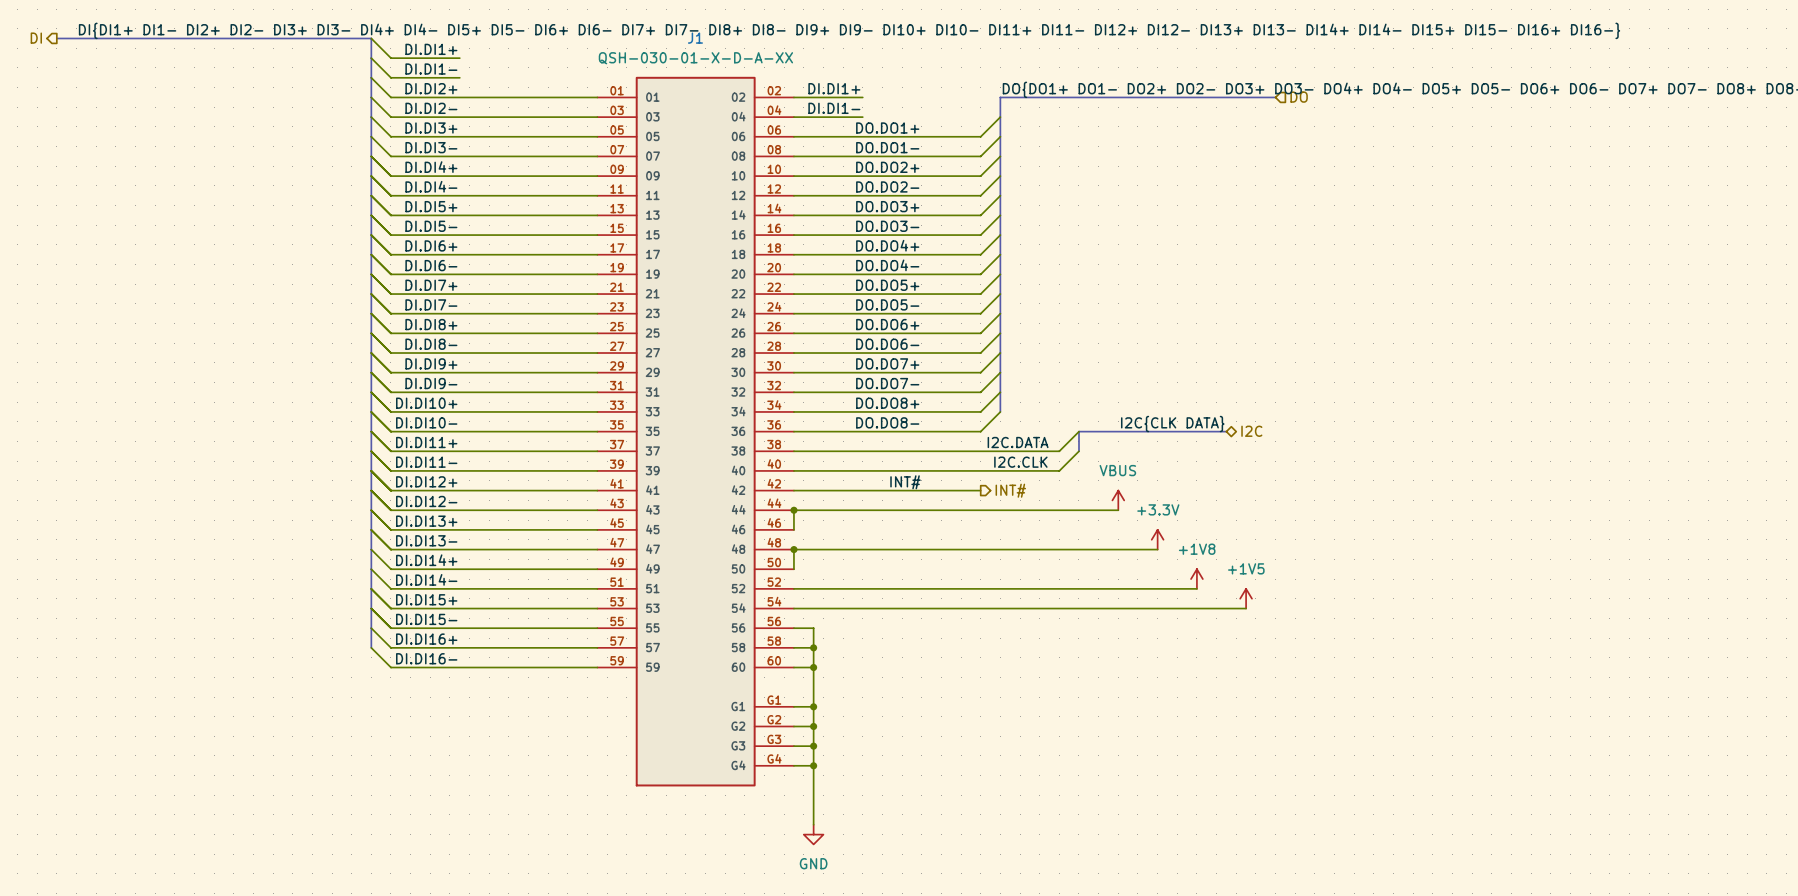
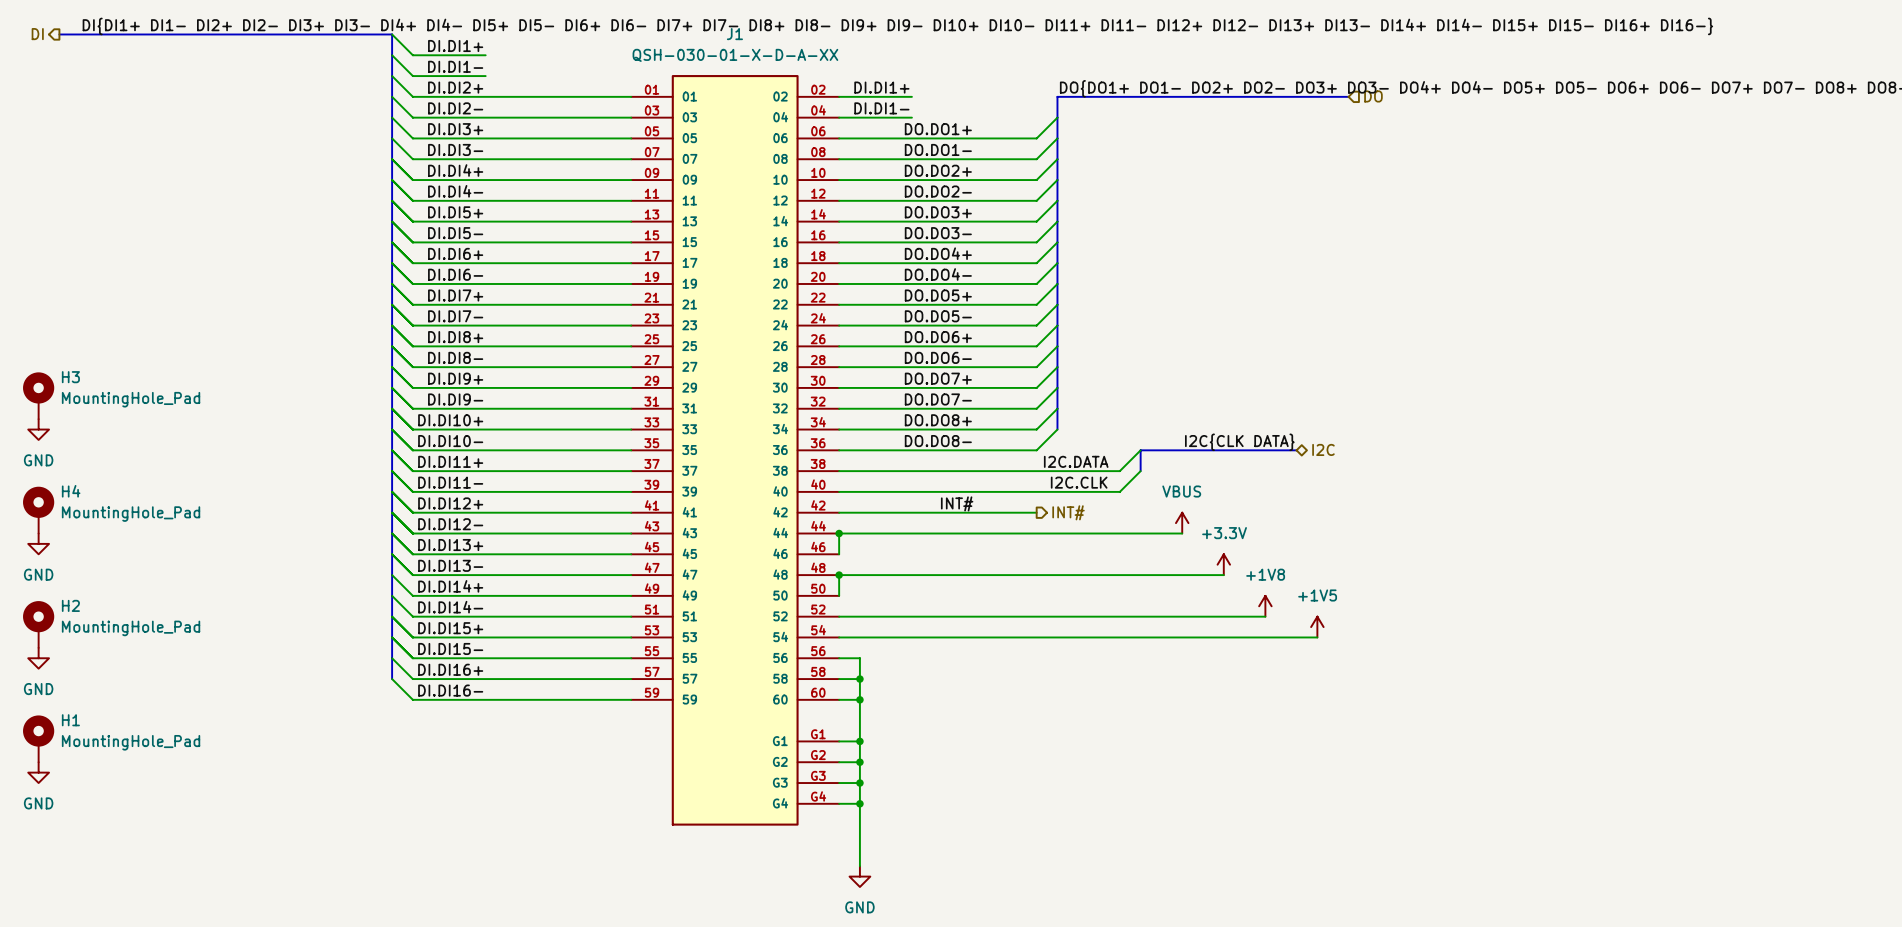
H3: none -> MountingHole_Pad (38, 395)
power symbol: none -> GND (38, 429)
H4: none -> MountingHole_Pad (38, 510)
power symbol: none -> GND (38, 543)
H2: none -> MountingHole_Pad (38, 624)
power symbol: none -> GND (38, 658)
H1: none -> MountingHole_Pad (38, 738)
power symbol: none -> GND (38, 772)

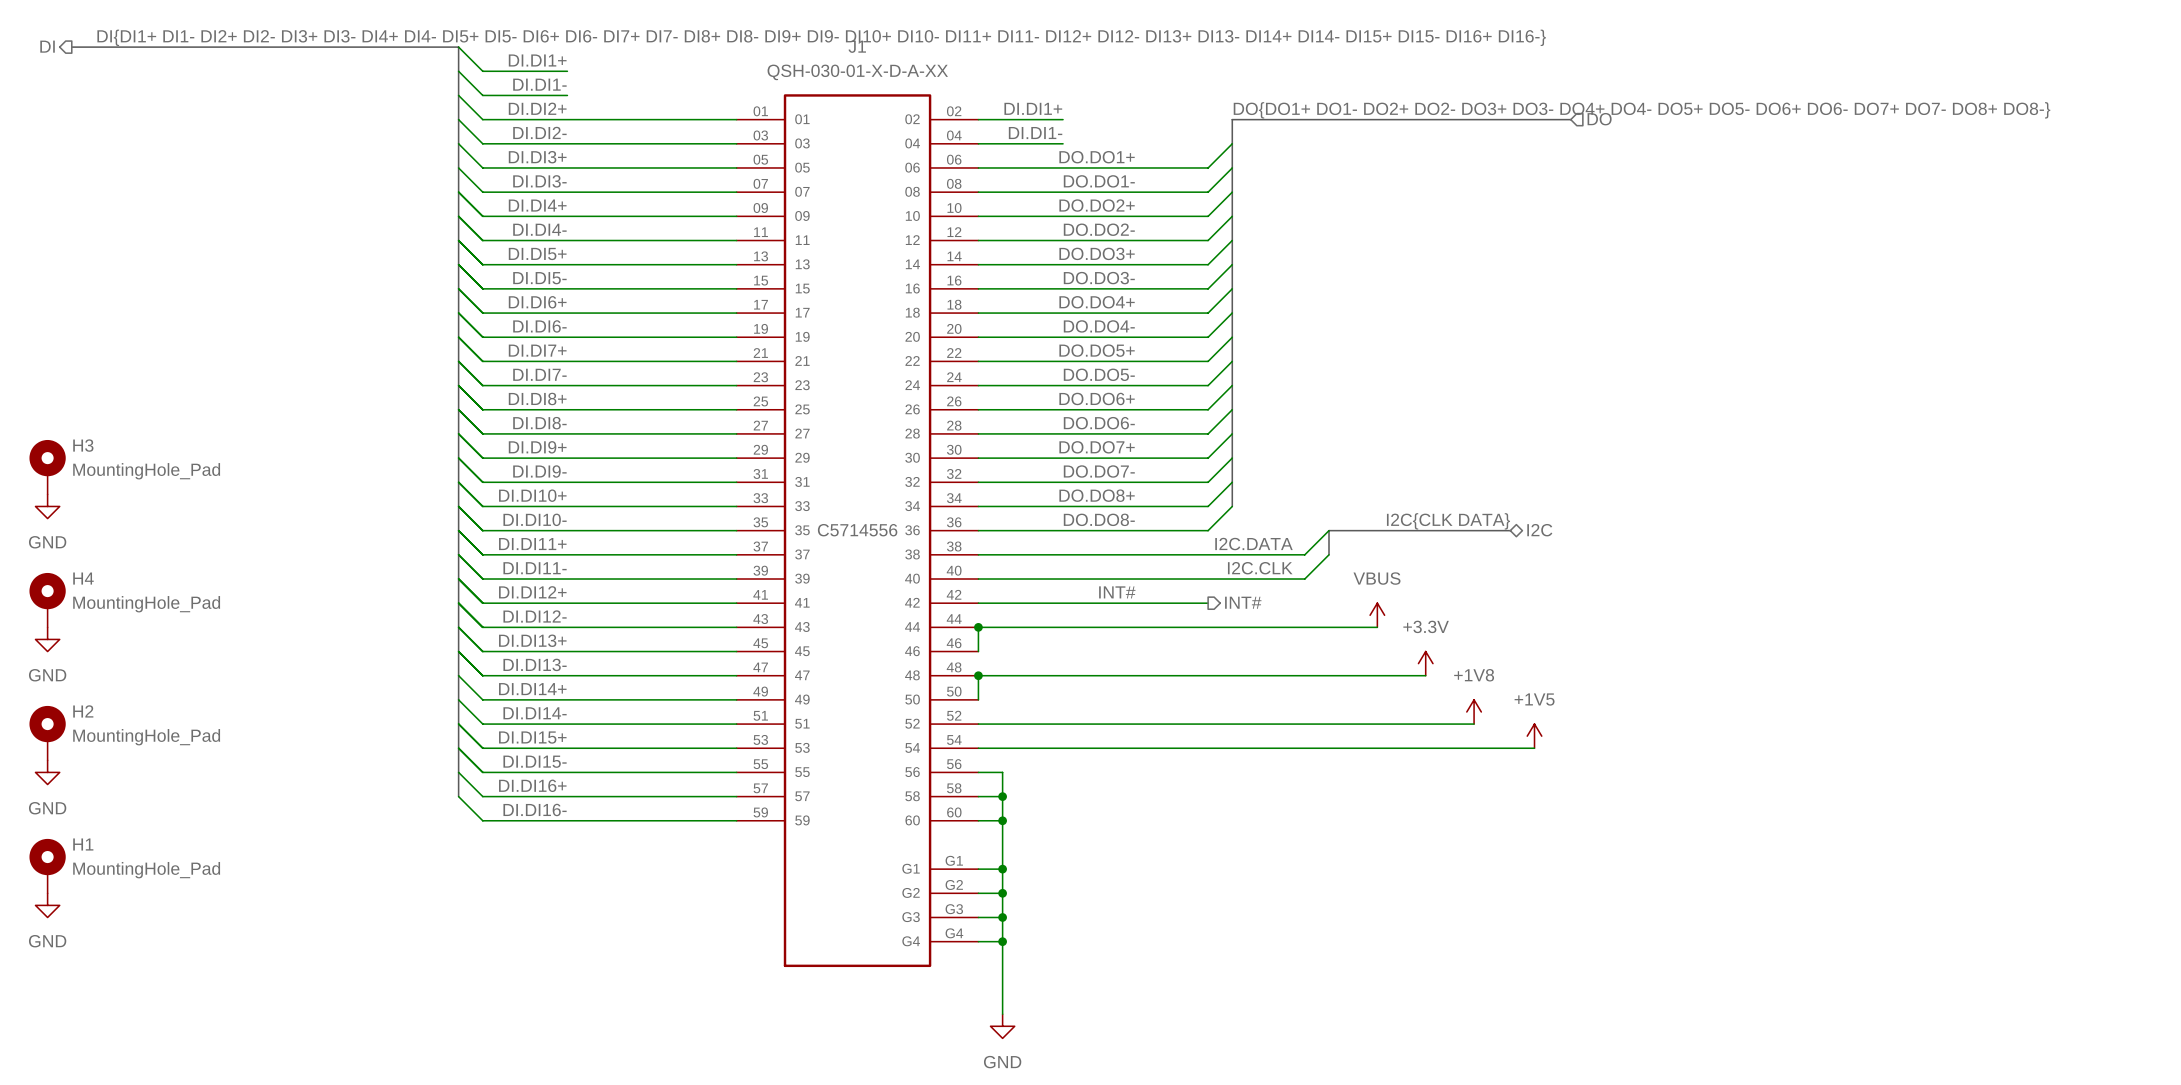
J1 text: none -> C5714556 (857, 530)

